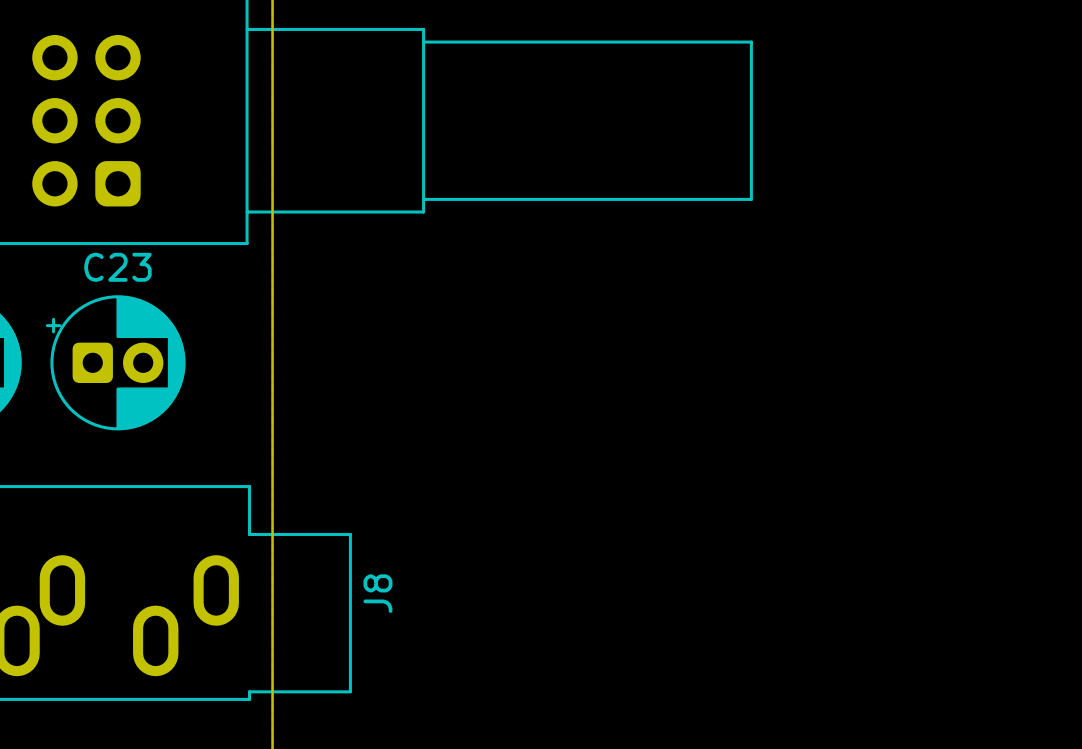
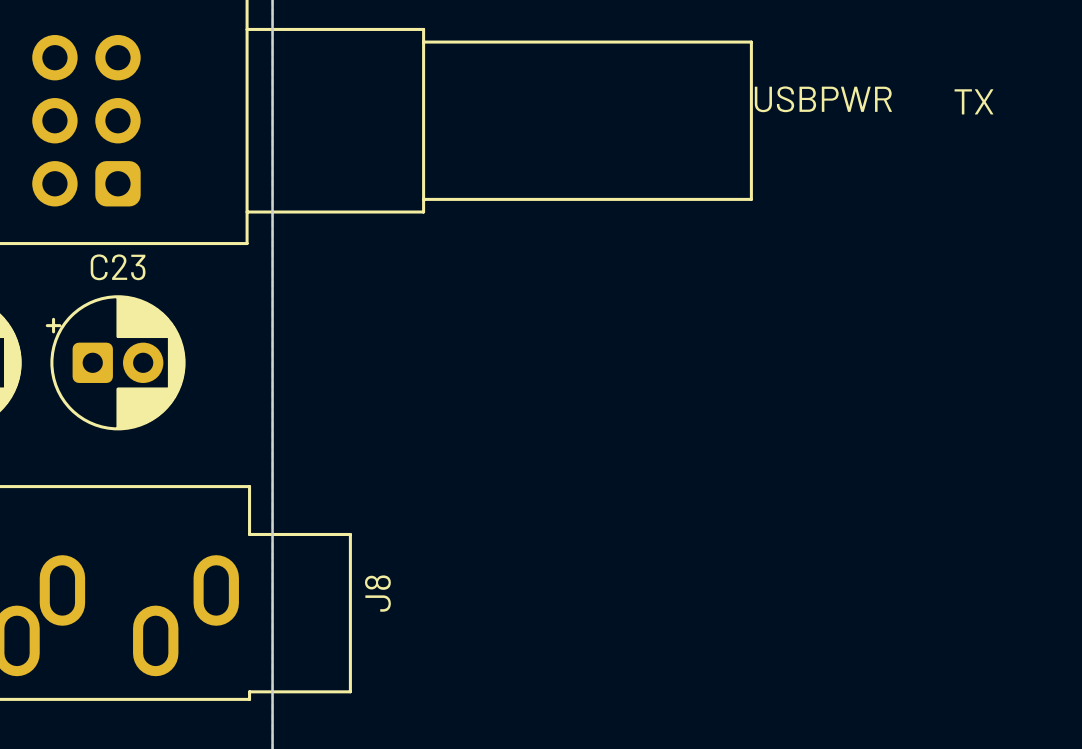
text: none -> USBPWR (823, 99)
text: none -> TX (973, 101)

